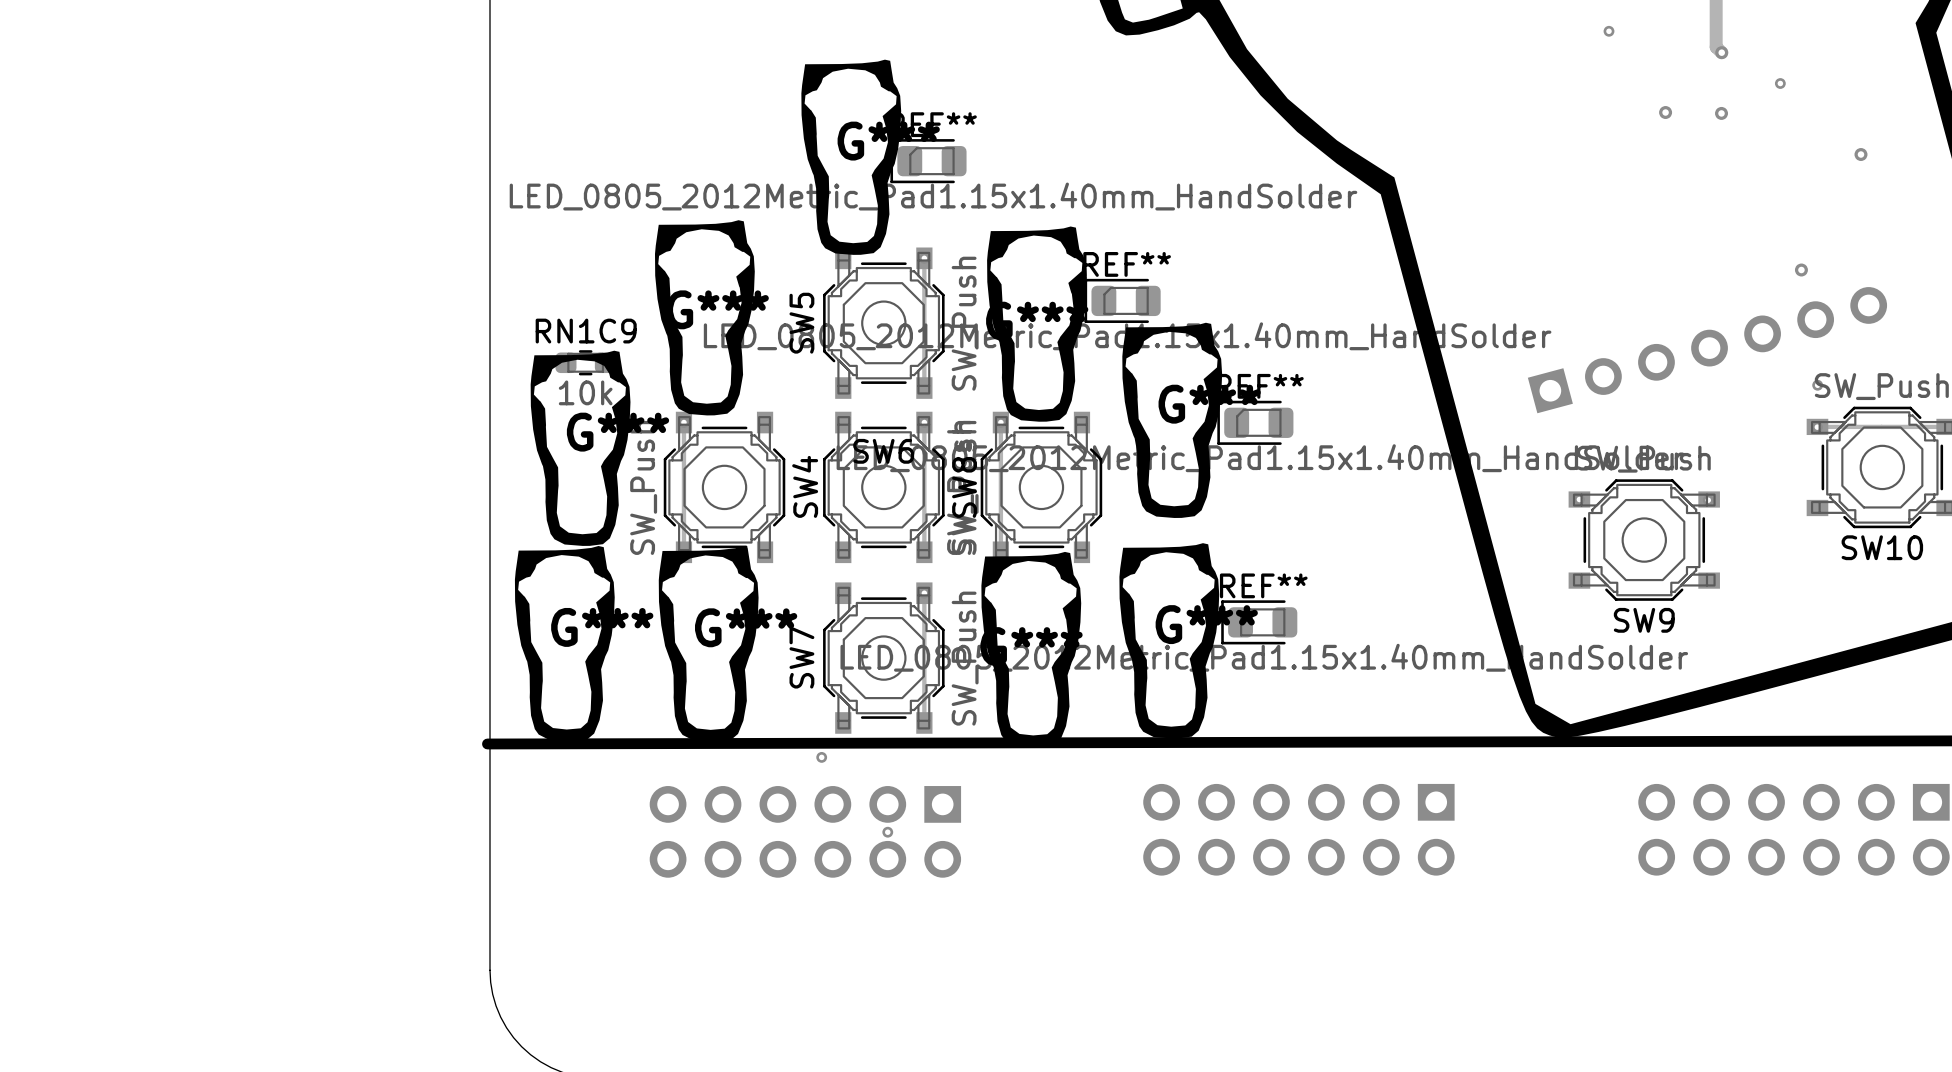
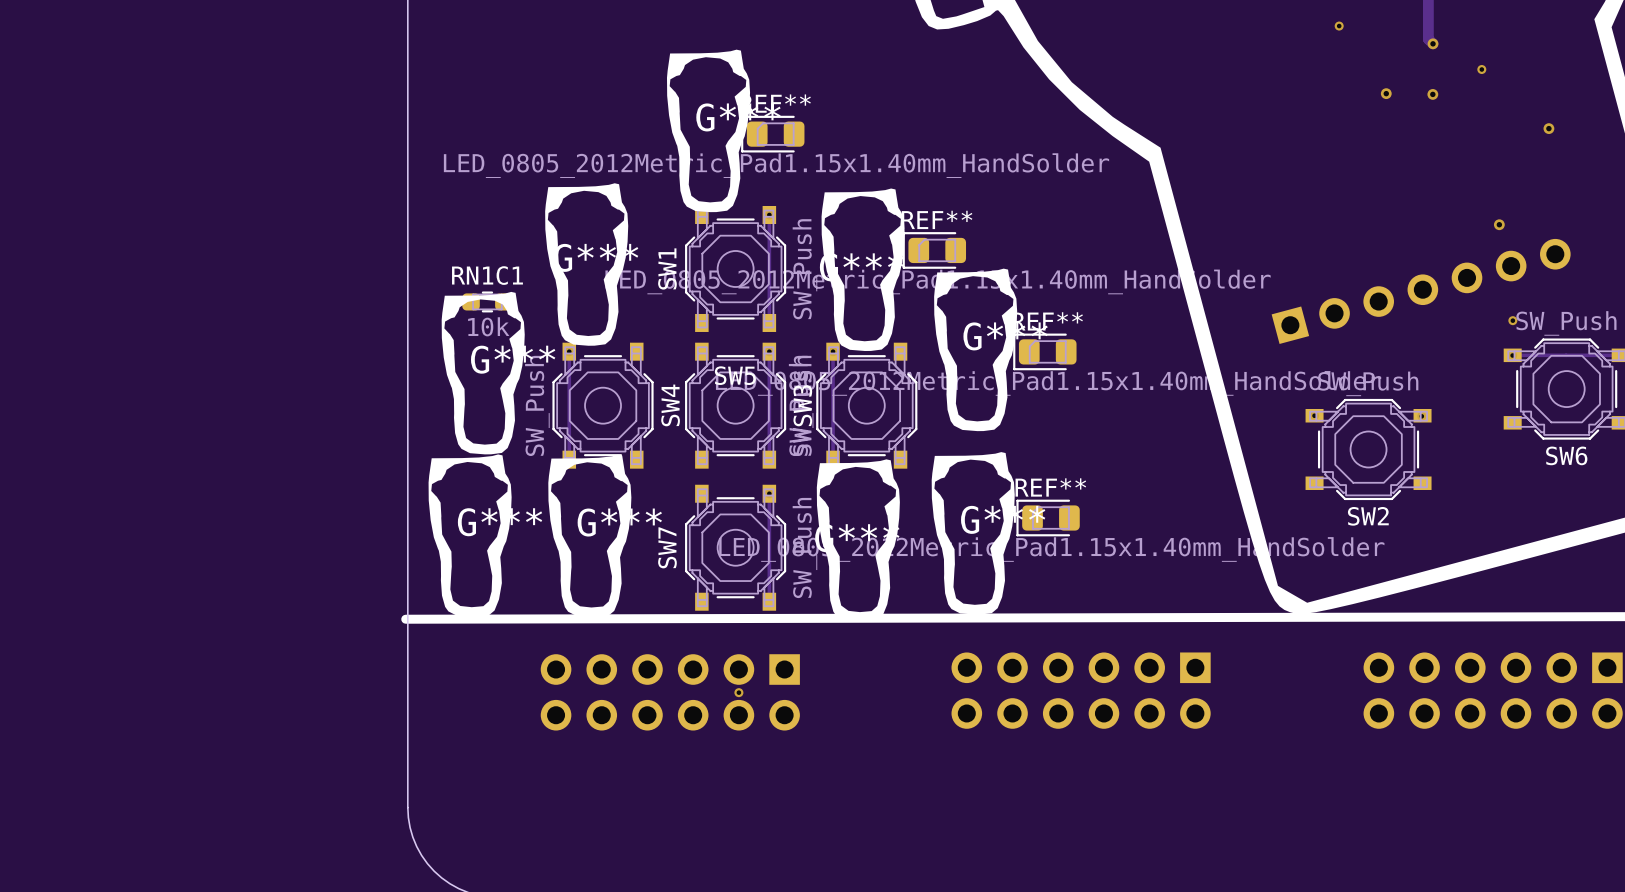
SW5 name: SW5 (801, 323) -> SW1 (667, 268)
RN1C9 name: RN1C9 (586, 331) -> RN1C1 (487, 275)
SW6 name: SW6 (883, 451) -> SW5 (735, 375)
SW8 name: SW8 (964, 487) -> SW3 (802, 405)
SW10 name: SW10 (1882, 547) -> SW6 (1566, 455)
SW9 name: SW9 (1644, 620) -> SW2 (1368, 516)
via: (821, 757) -> none

